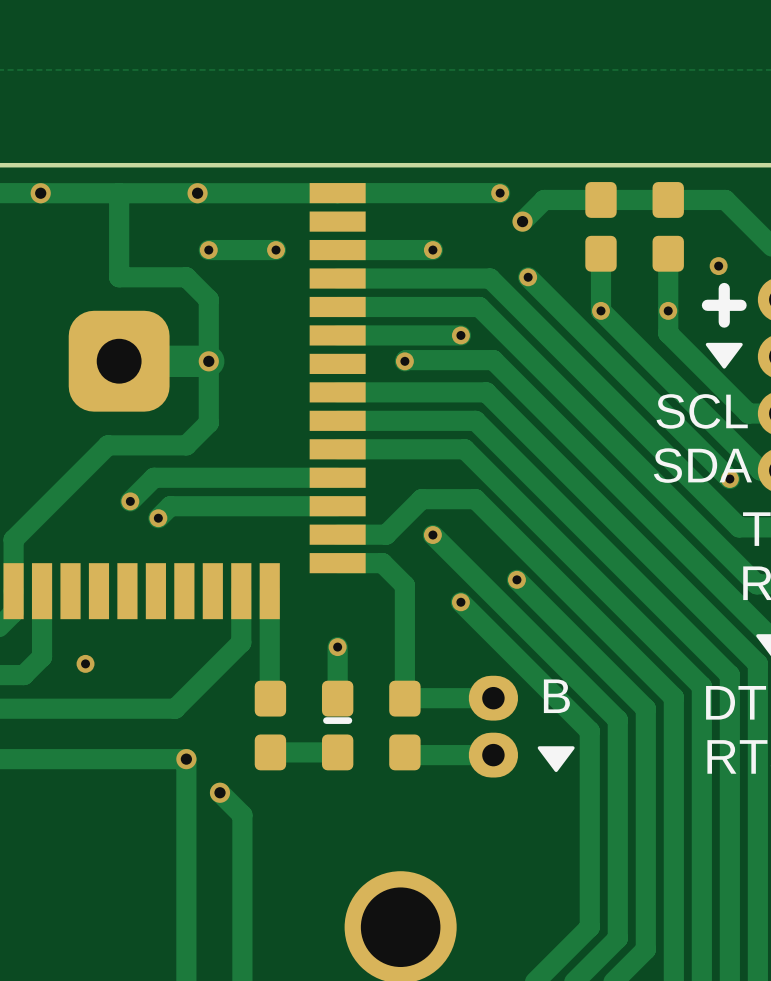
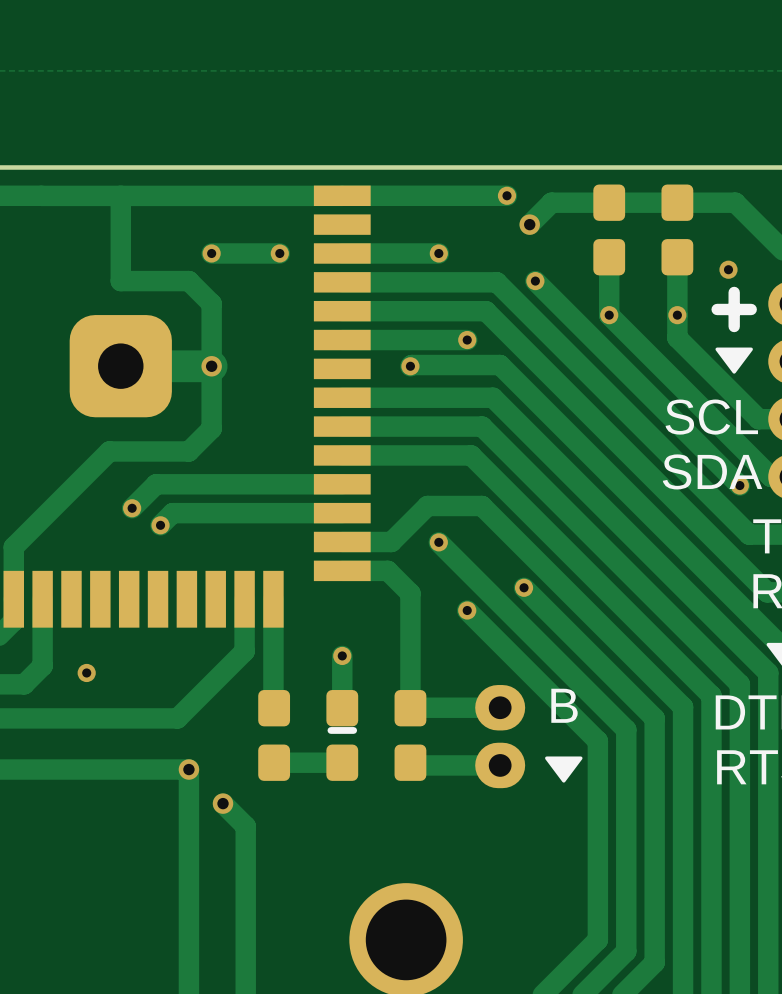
via: (40, 193) -> none
via: (197, 193) -> none

